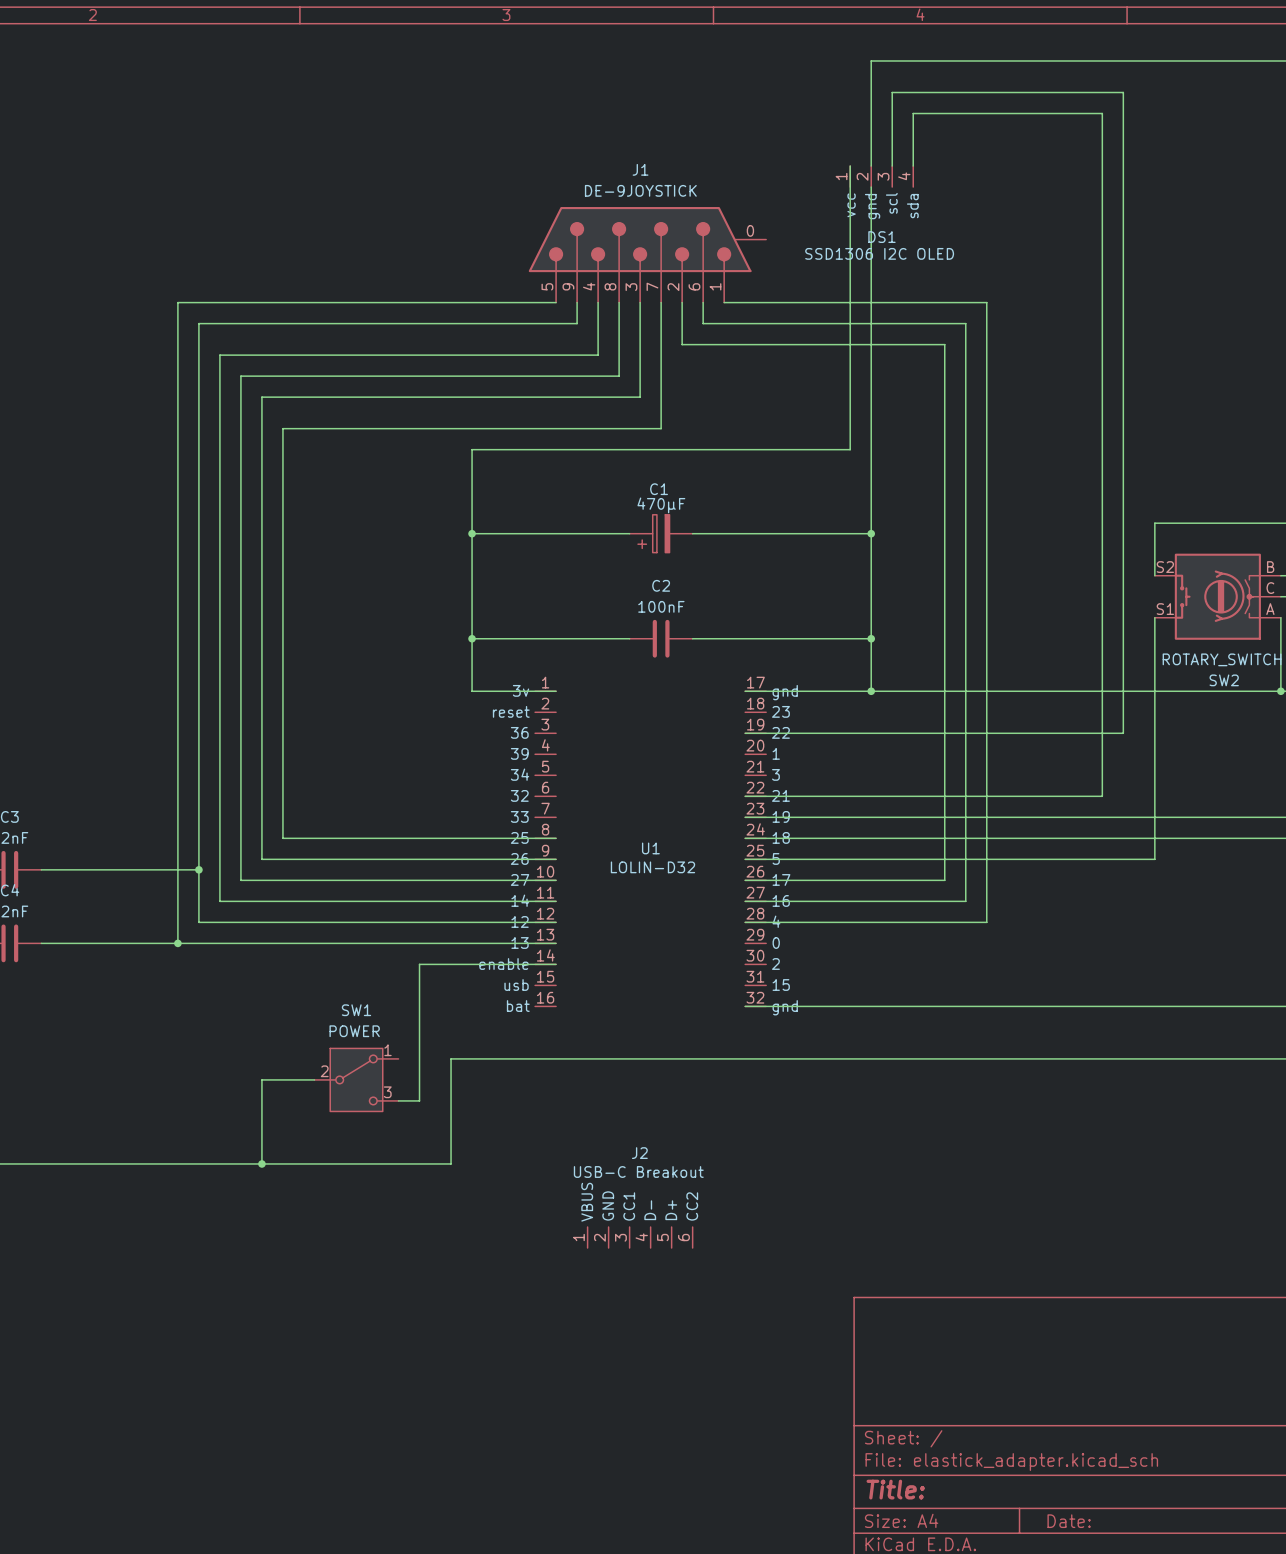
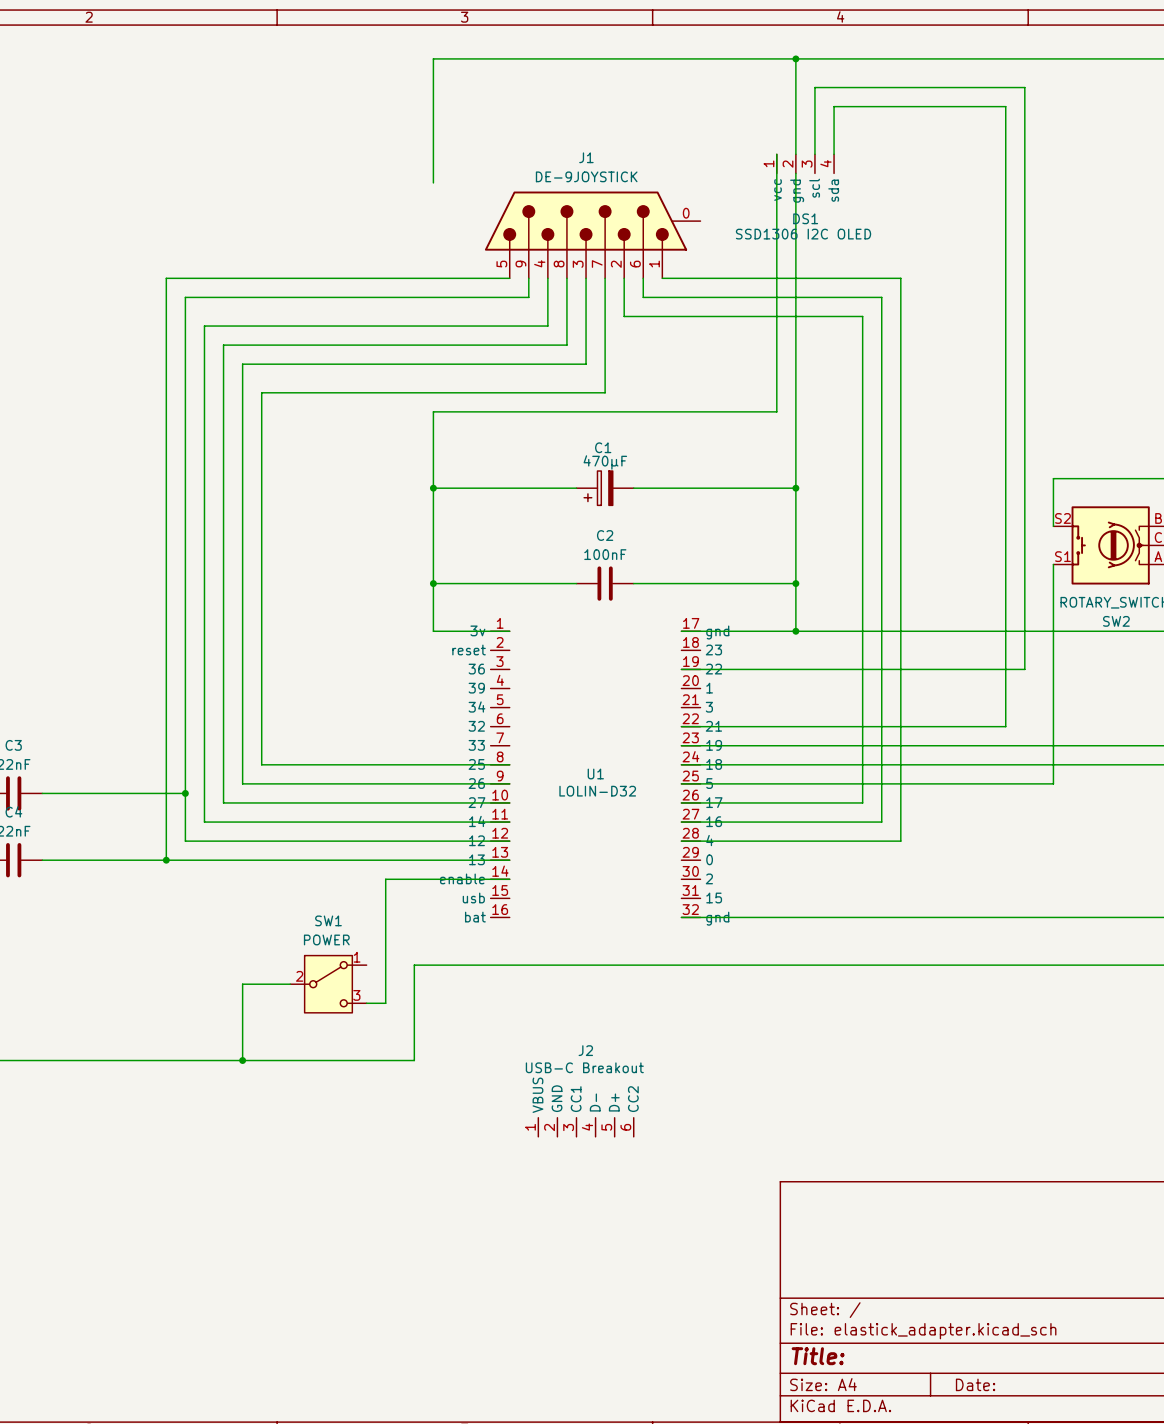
wire: none -> (795, 58) (433, 58) (433, 182)
junction: none -> (795, 58)

